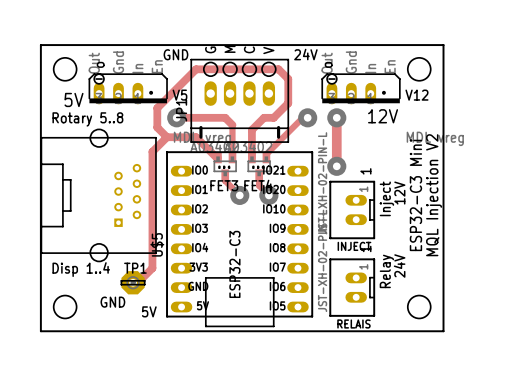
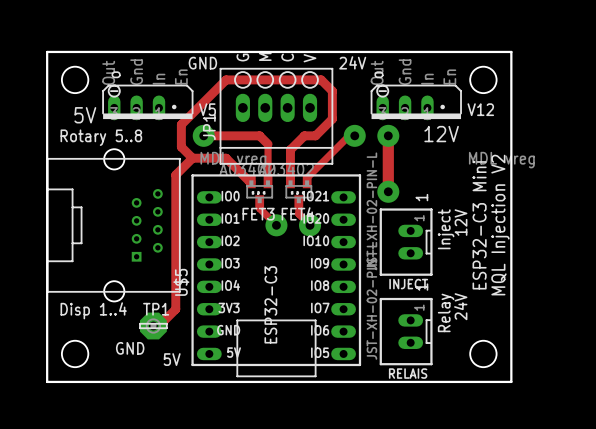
JP1 footprint: [190, 59, 289, 143] -> [219, 68, 333, 165]

